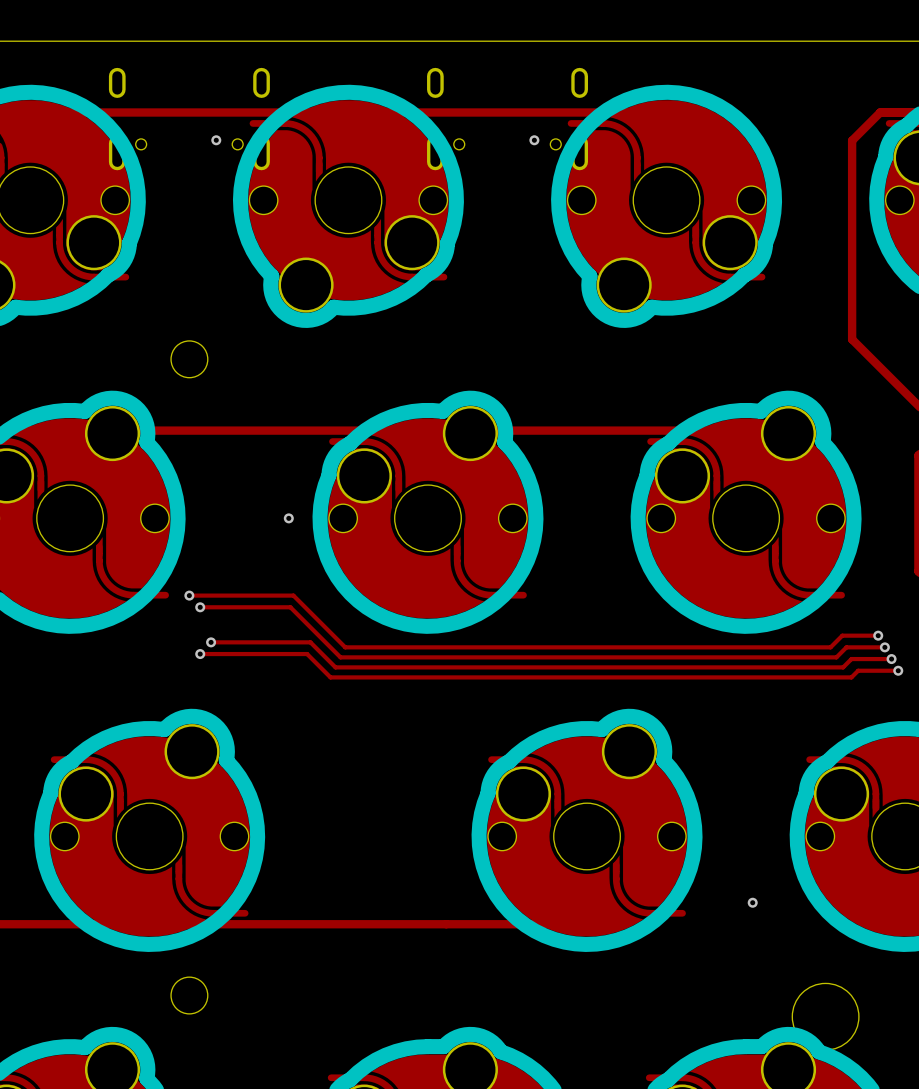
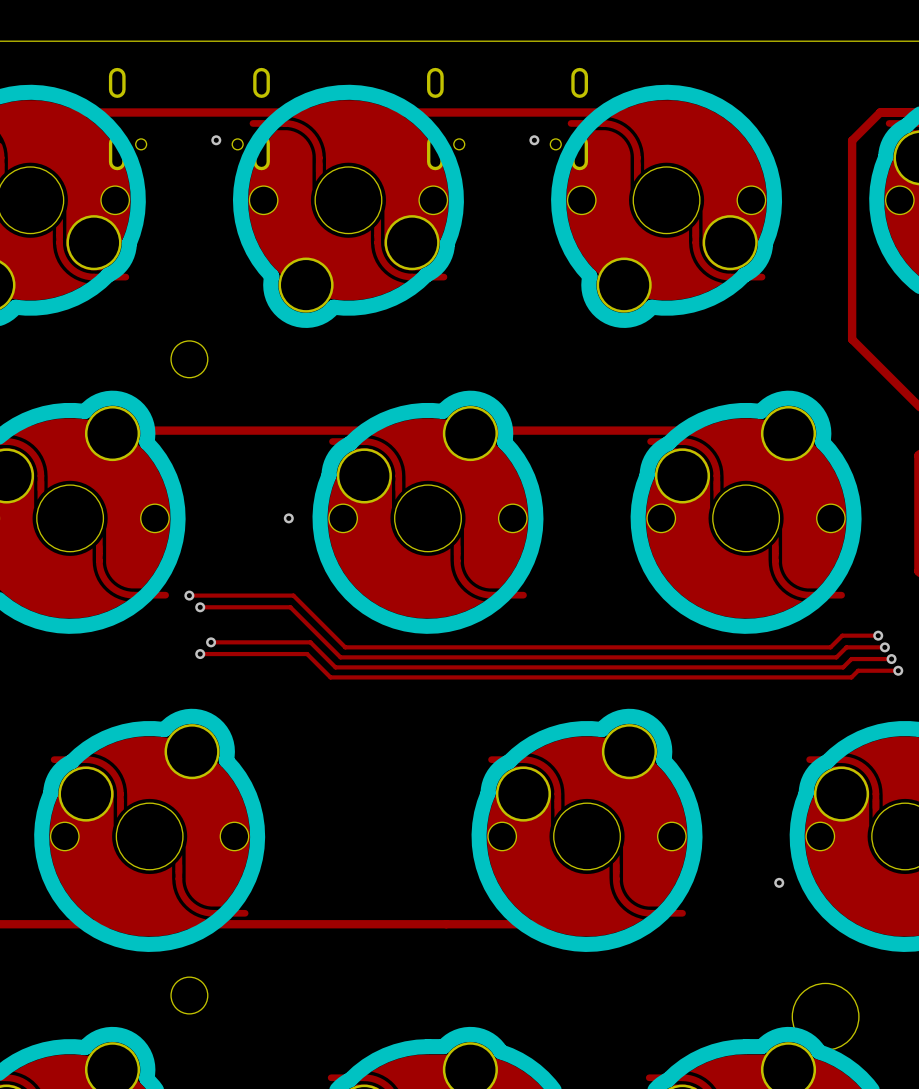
via position: (752, 902) -> (779, 882)

